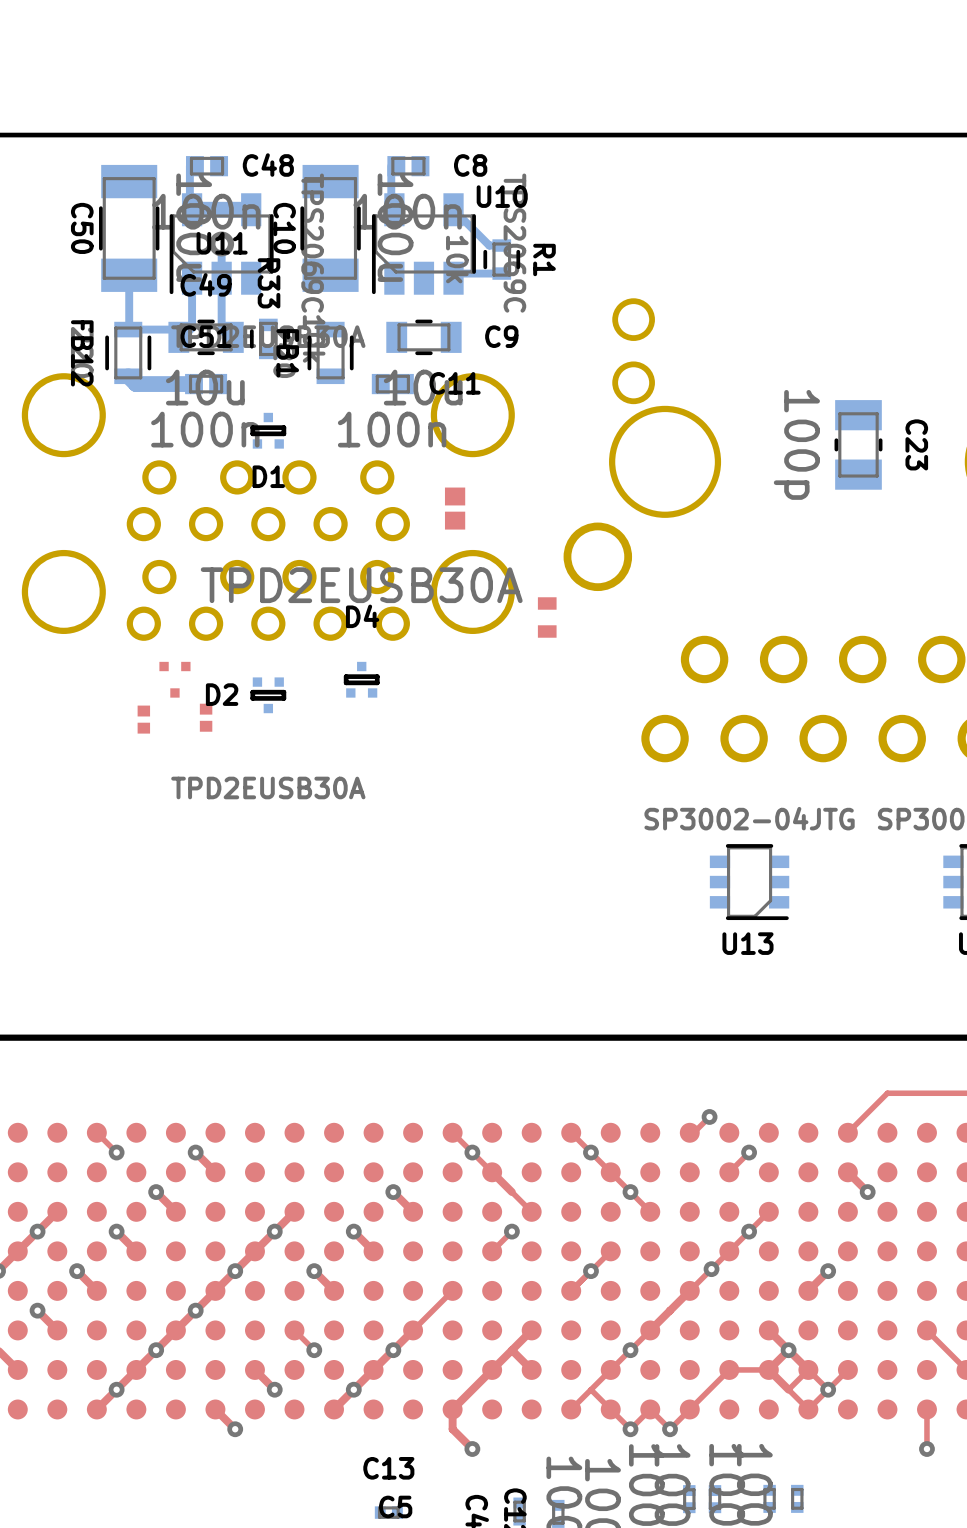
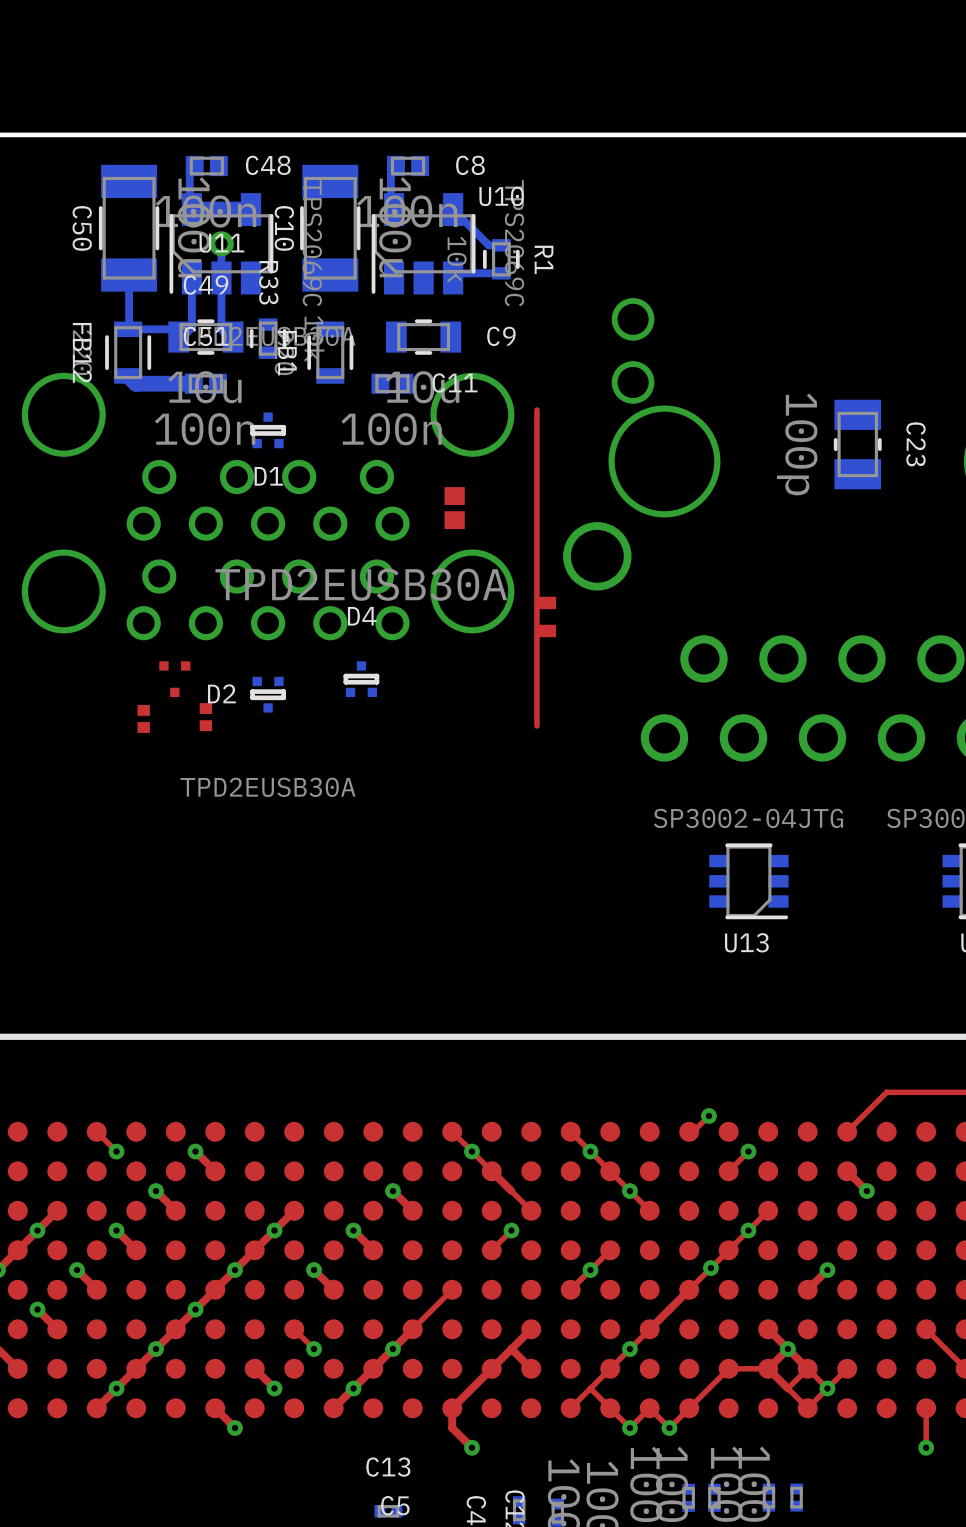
top track: none -> (536, 410) (536, 725)

